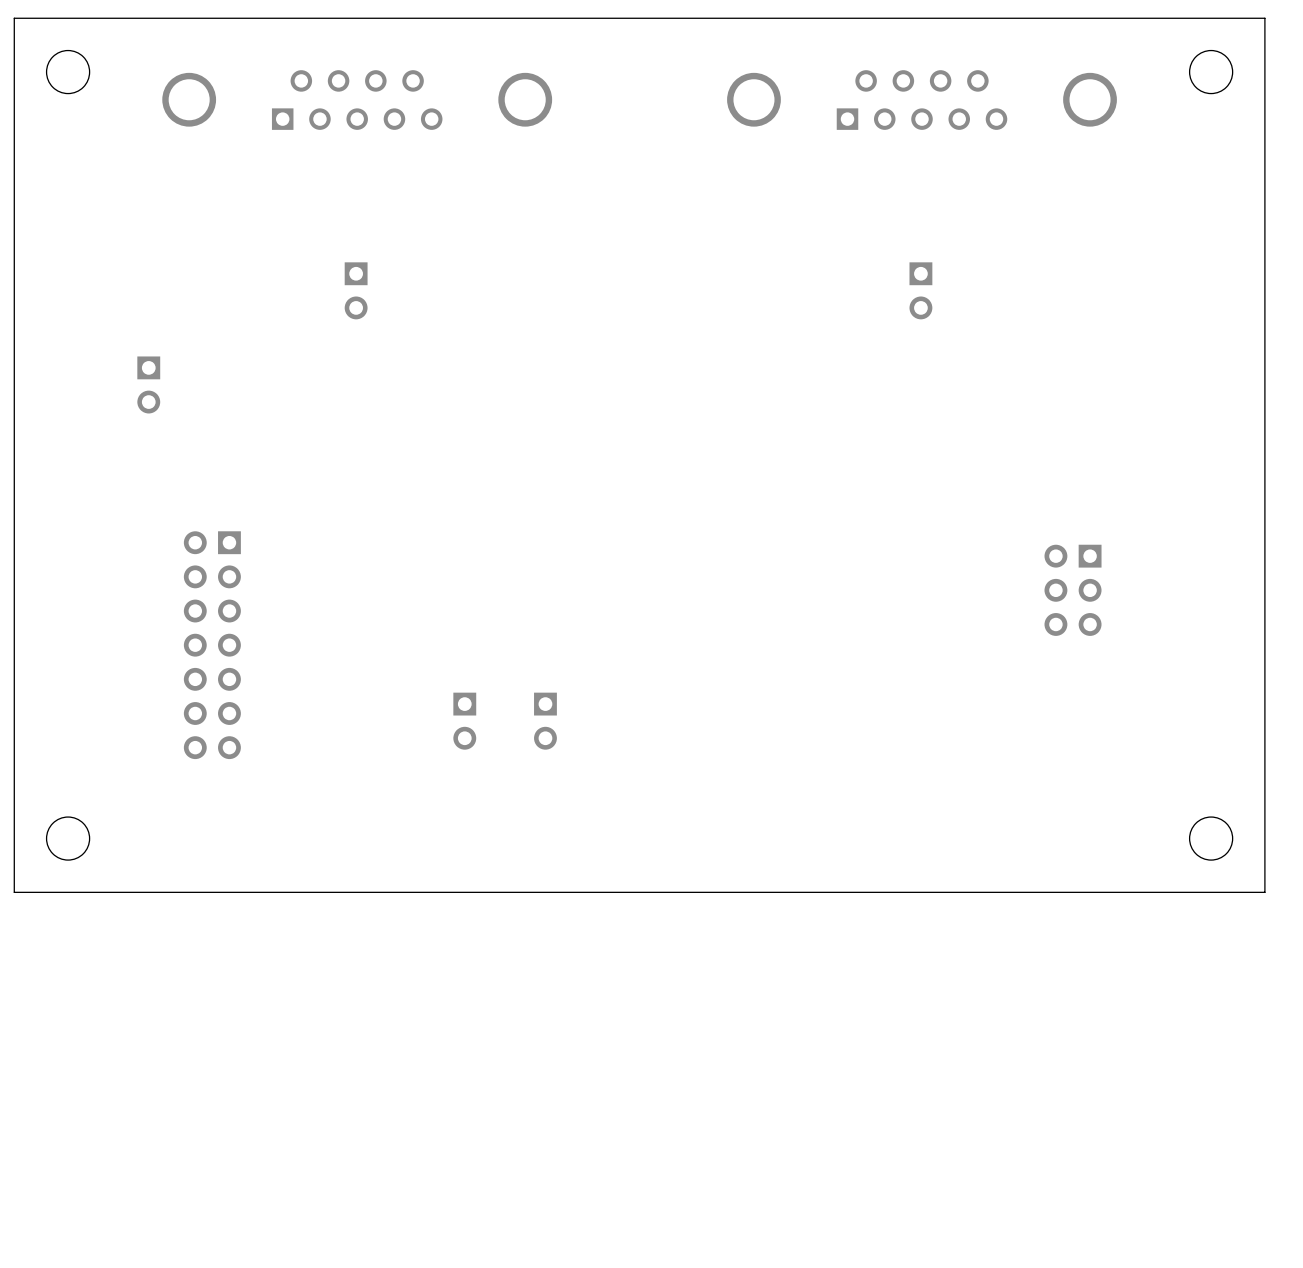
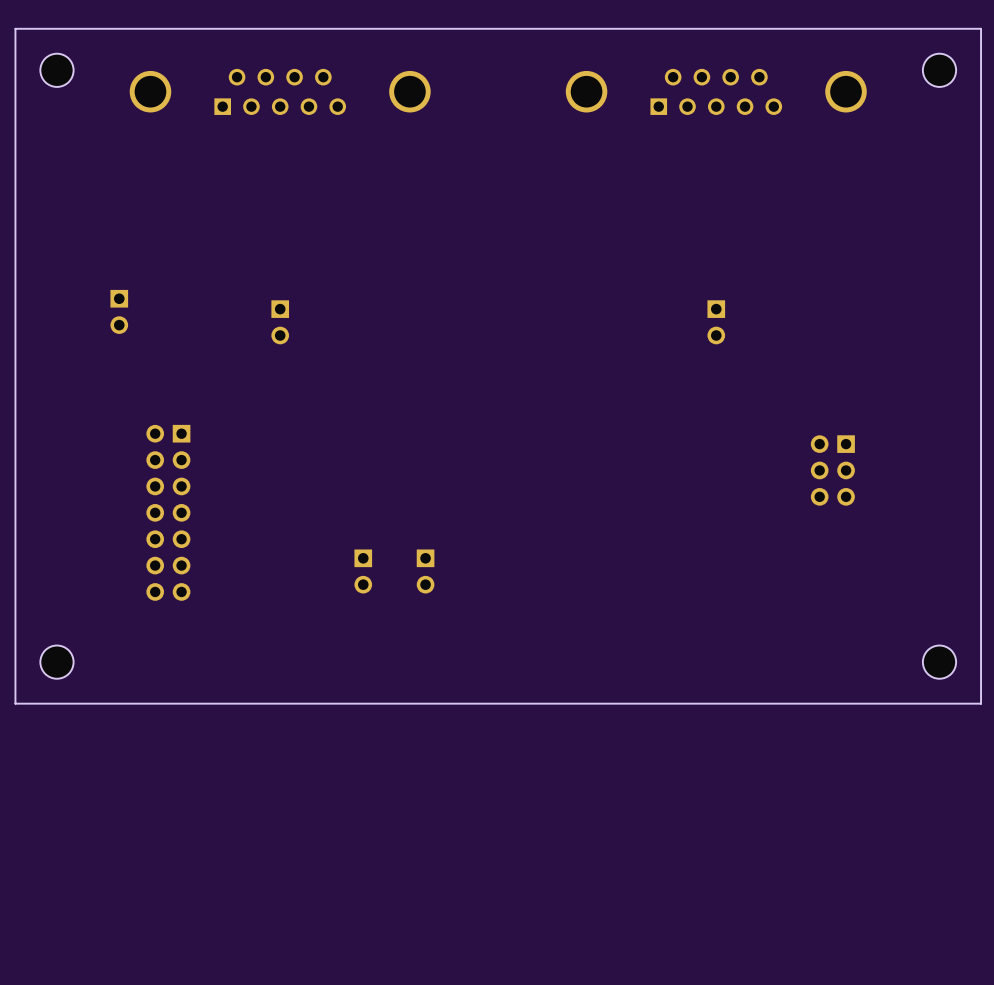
part position: (356, 290) -> (280, 322)
part position: (920, 290) -> (716, 322)

